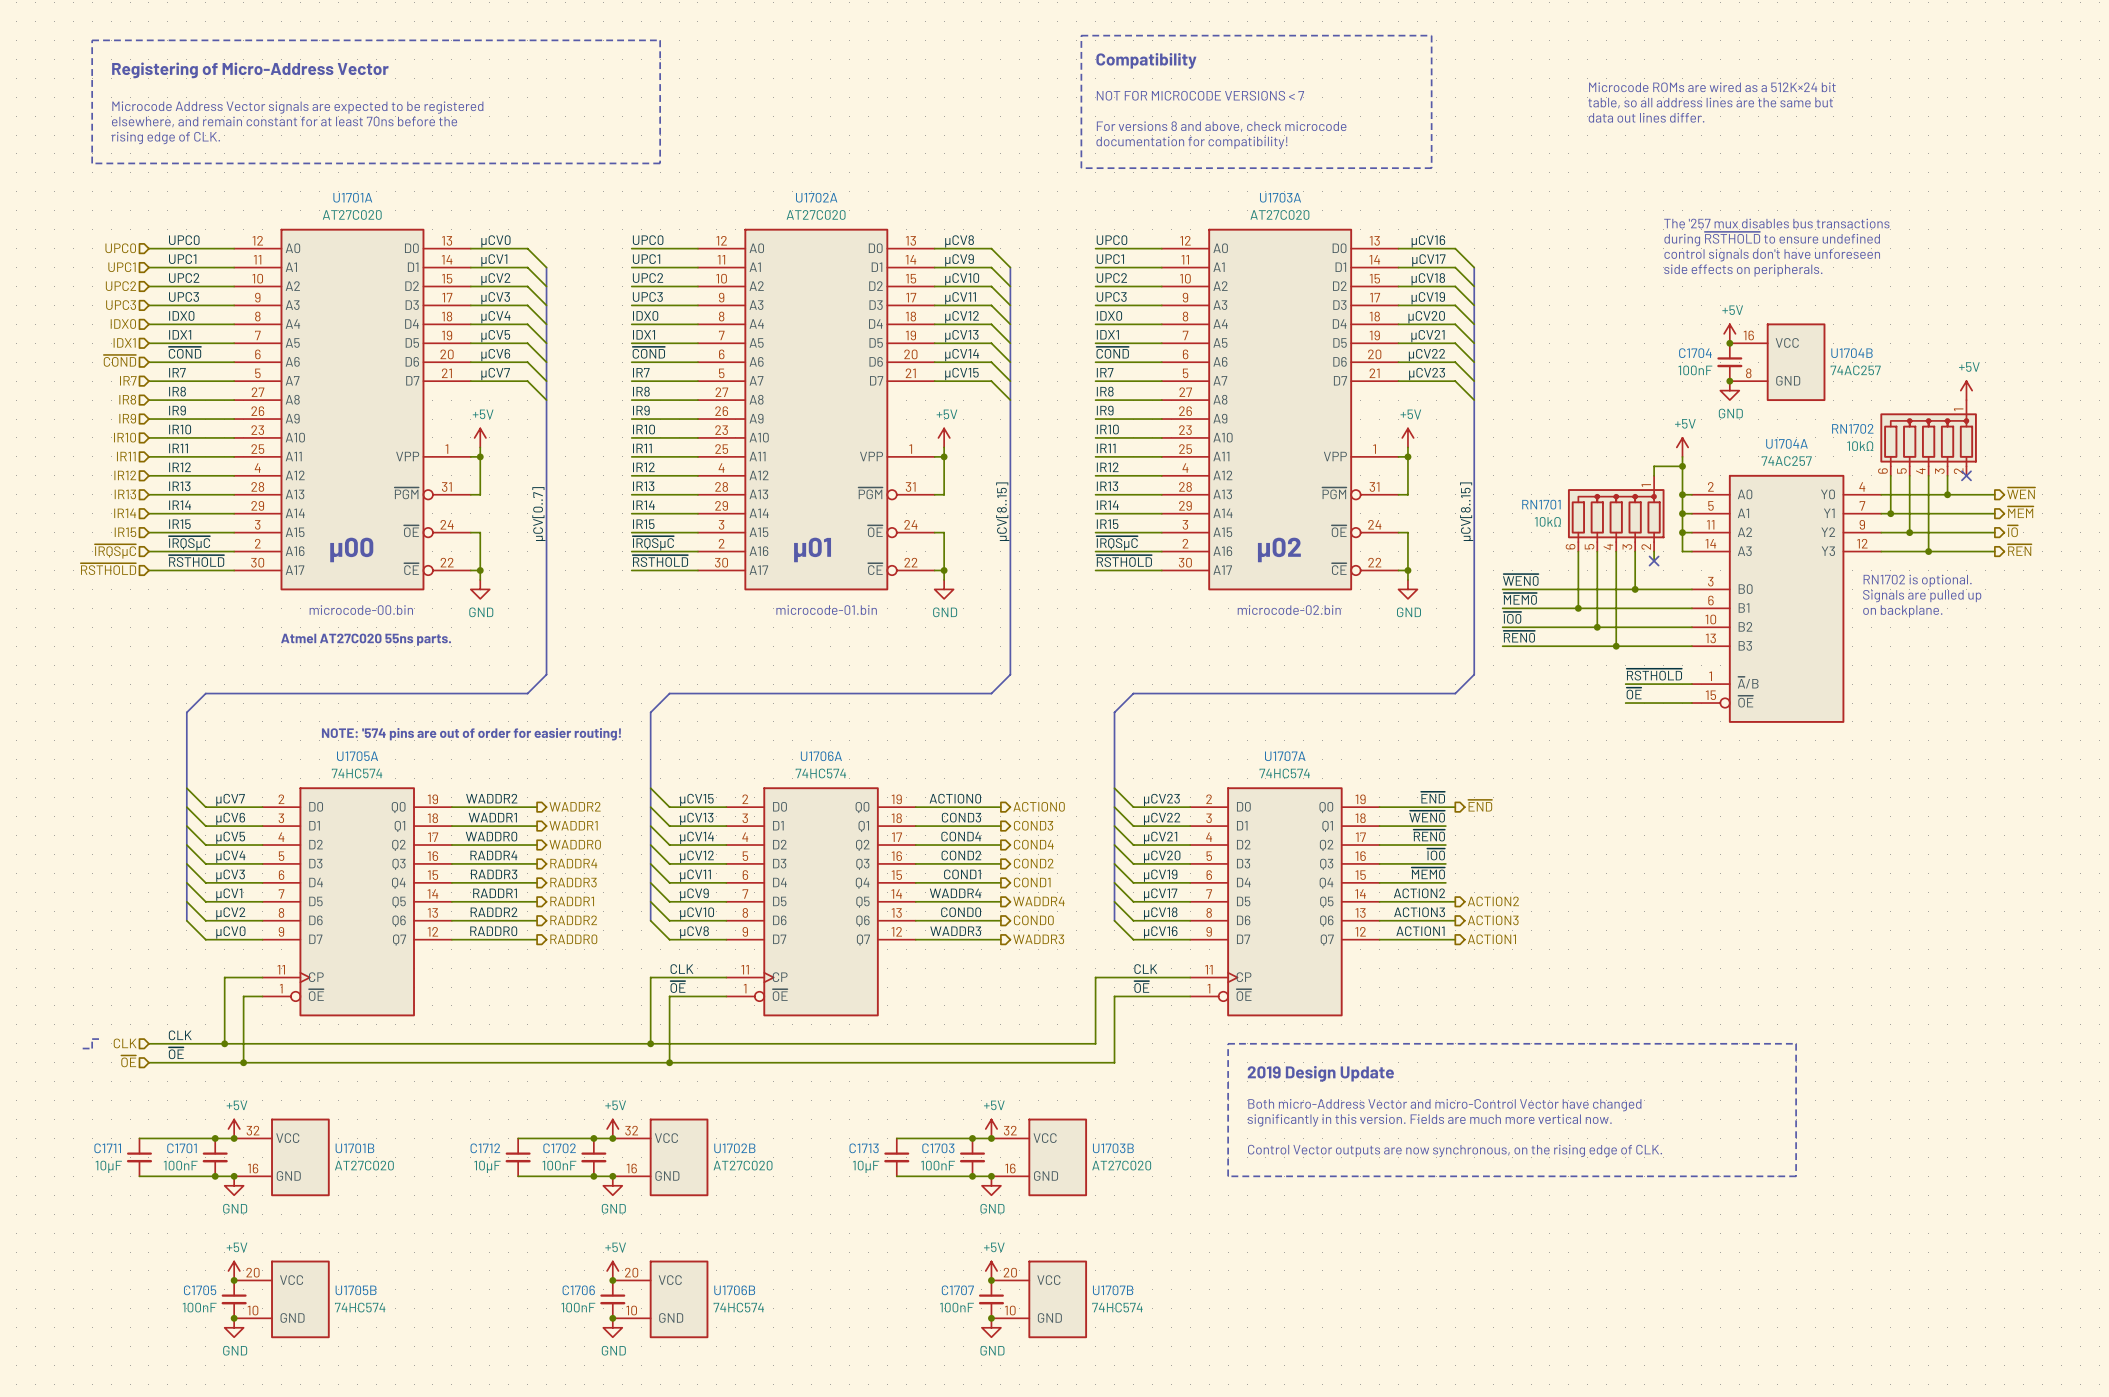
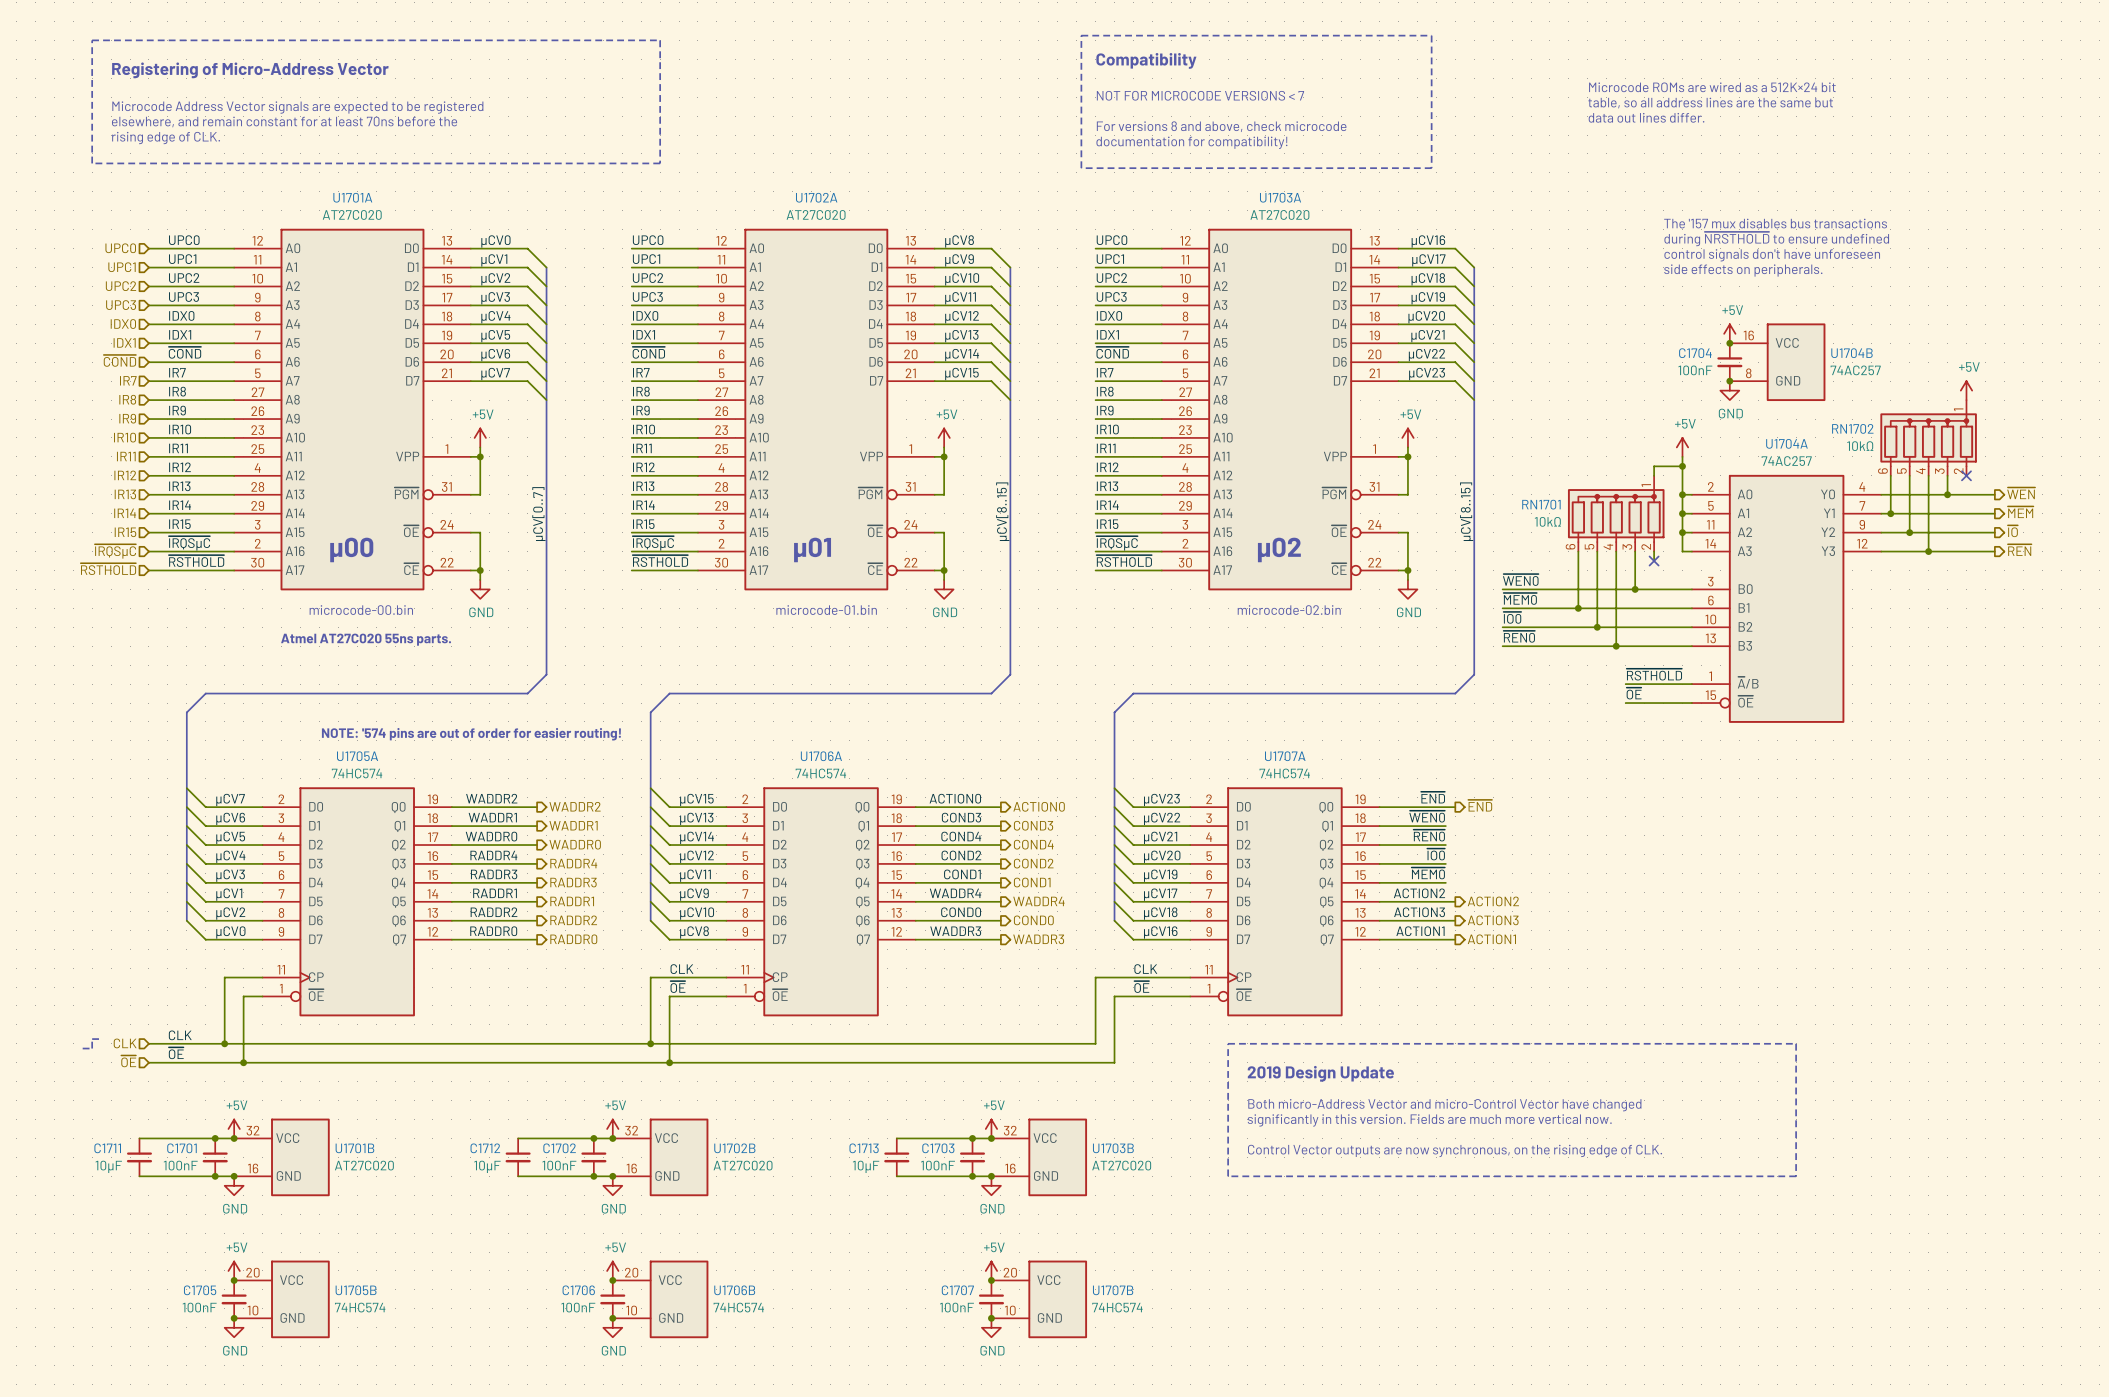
text: The '257 mux disables bus transactions (1776, 223) -> The '157 mux disables bus transactions (1775, 223)
text: during ~{RSTHOLD} to ensure undefined (1772, 239) -> during ~{NRSTHOLD} to ensure undefined (1776, 239)
text: RN1702 is optional. (1917, 580) -> none
text: Signals are pulled up (1922, 596) -> none
text: on backplane. (1902, 611) -> none

